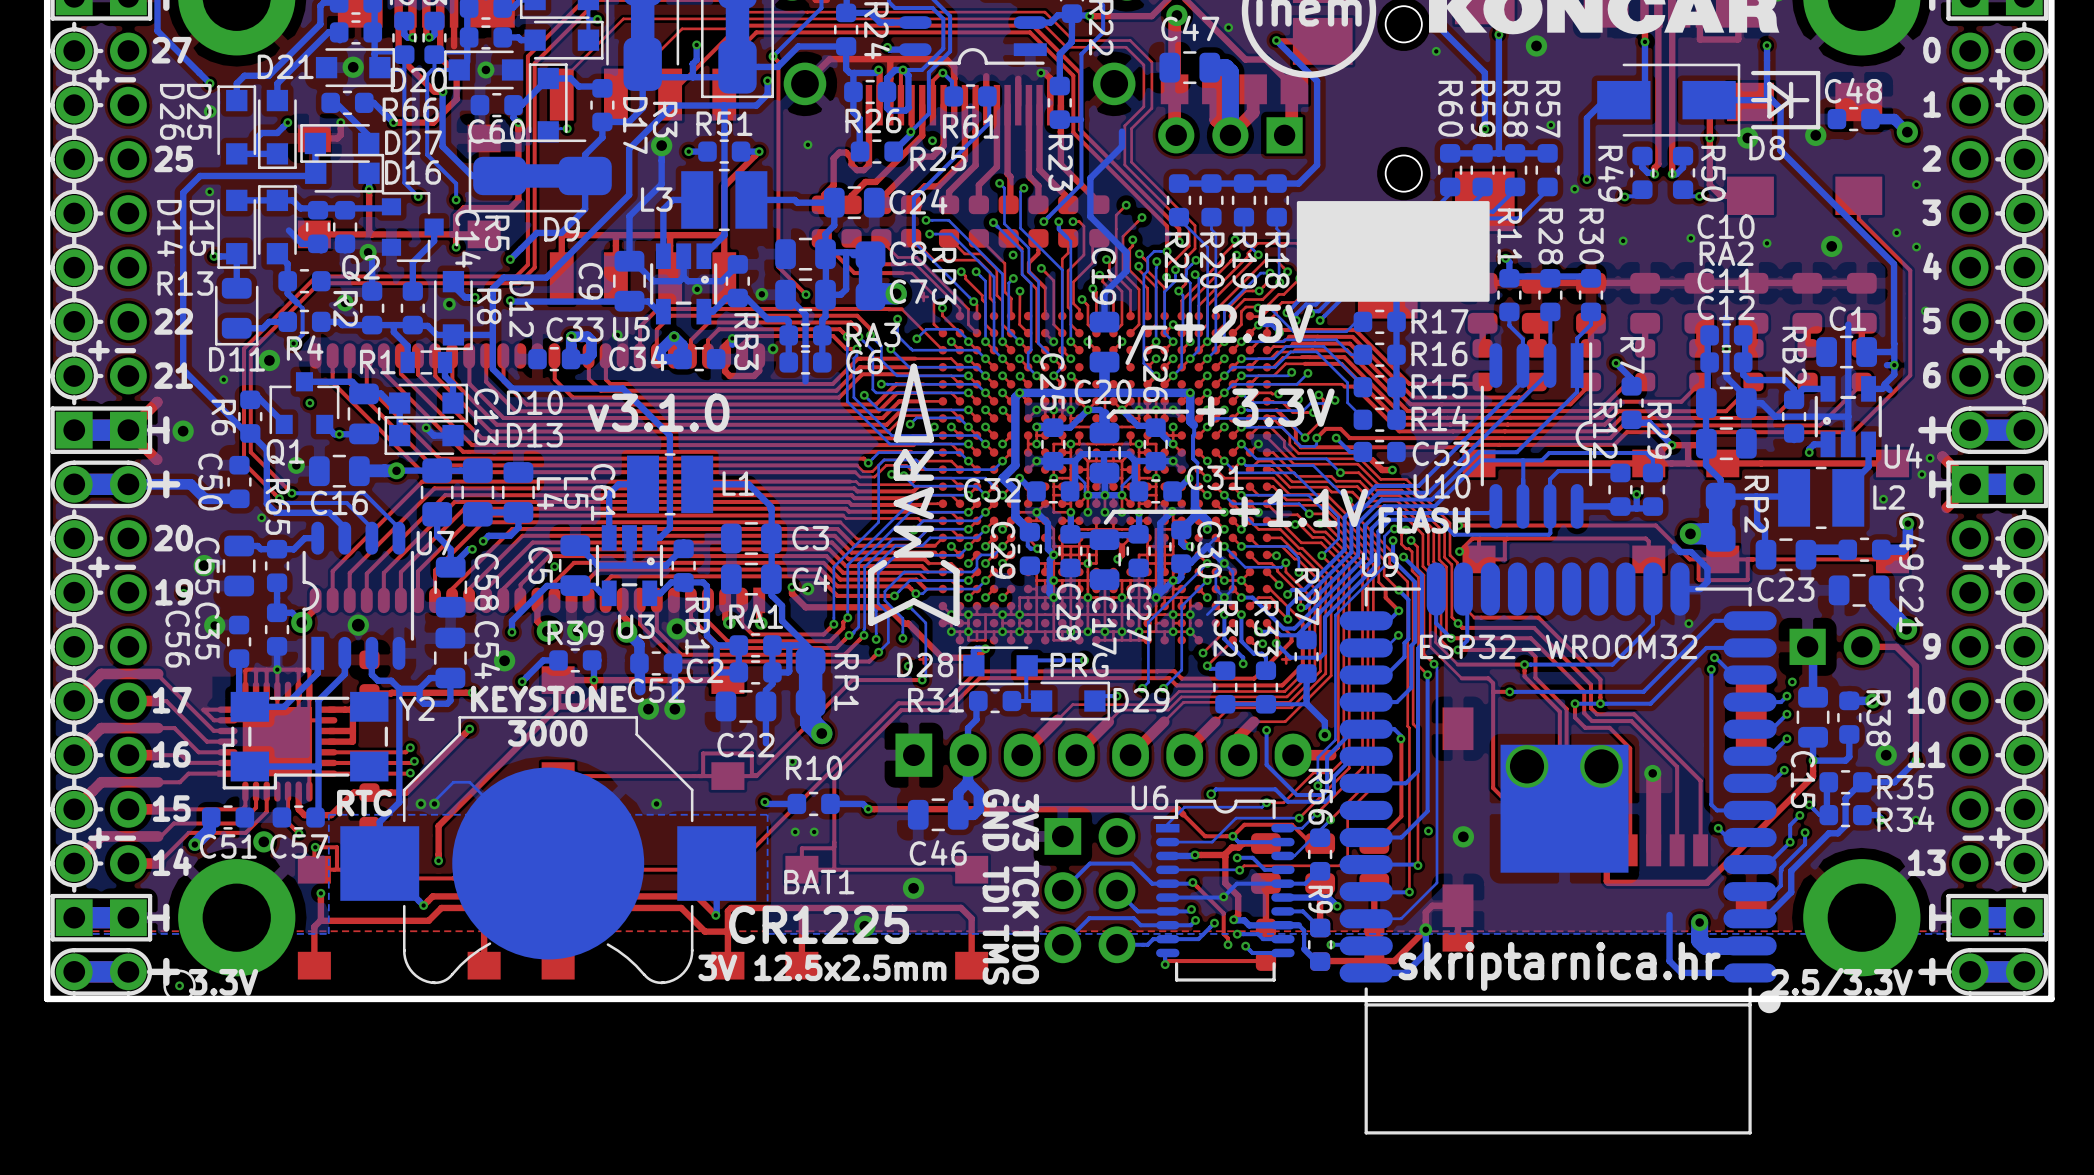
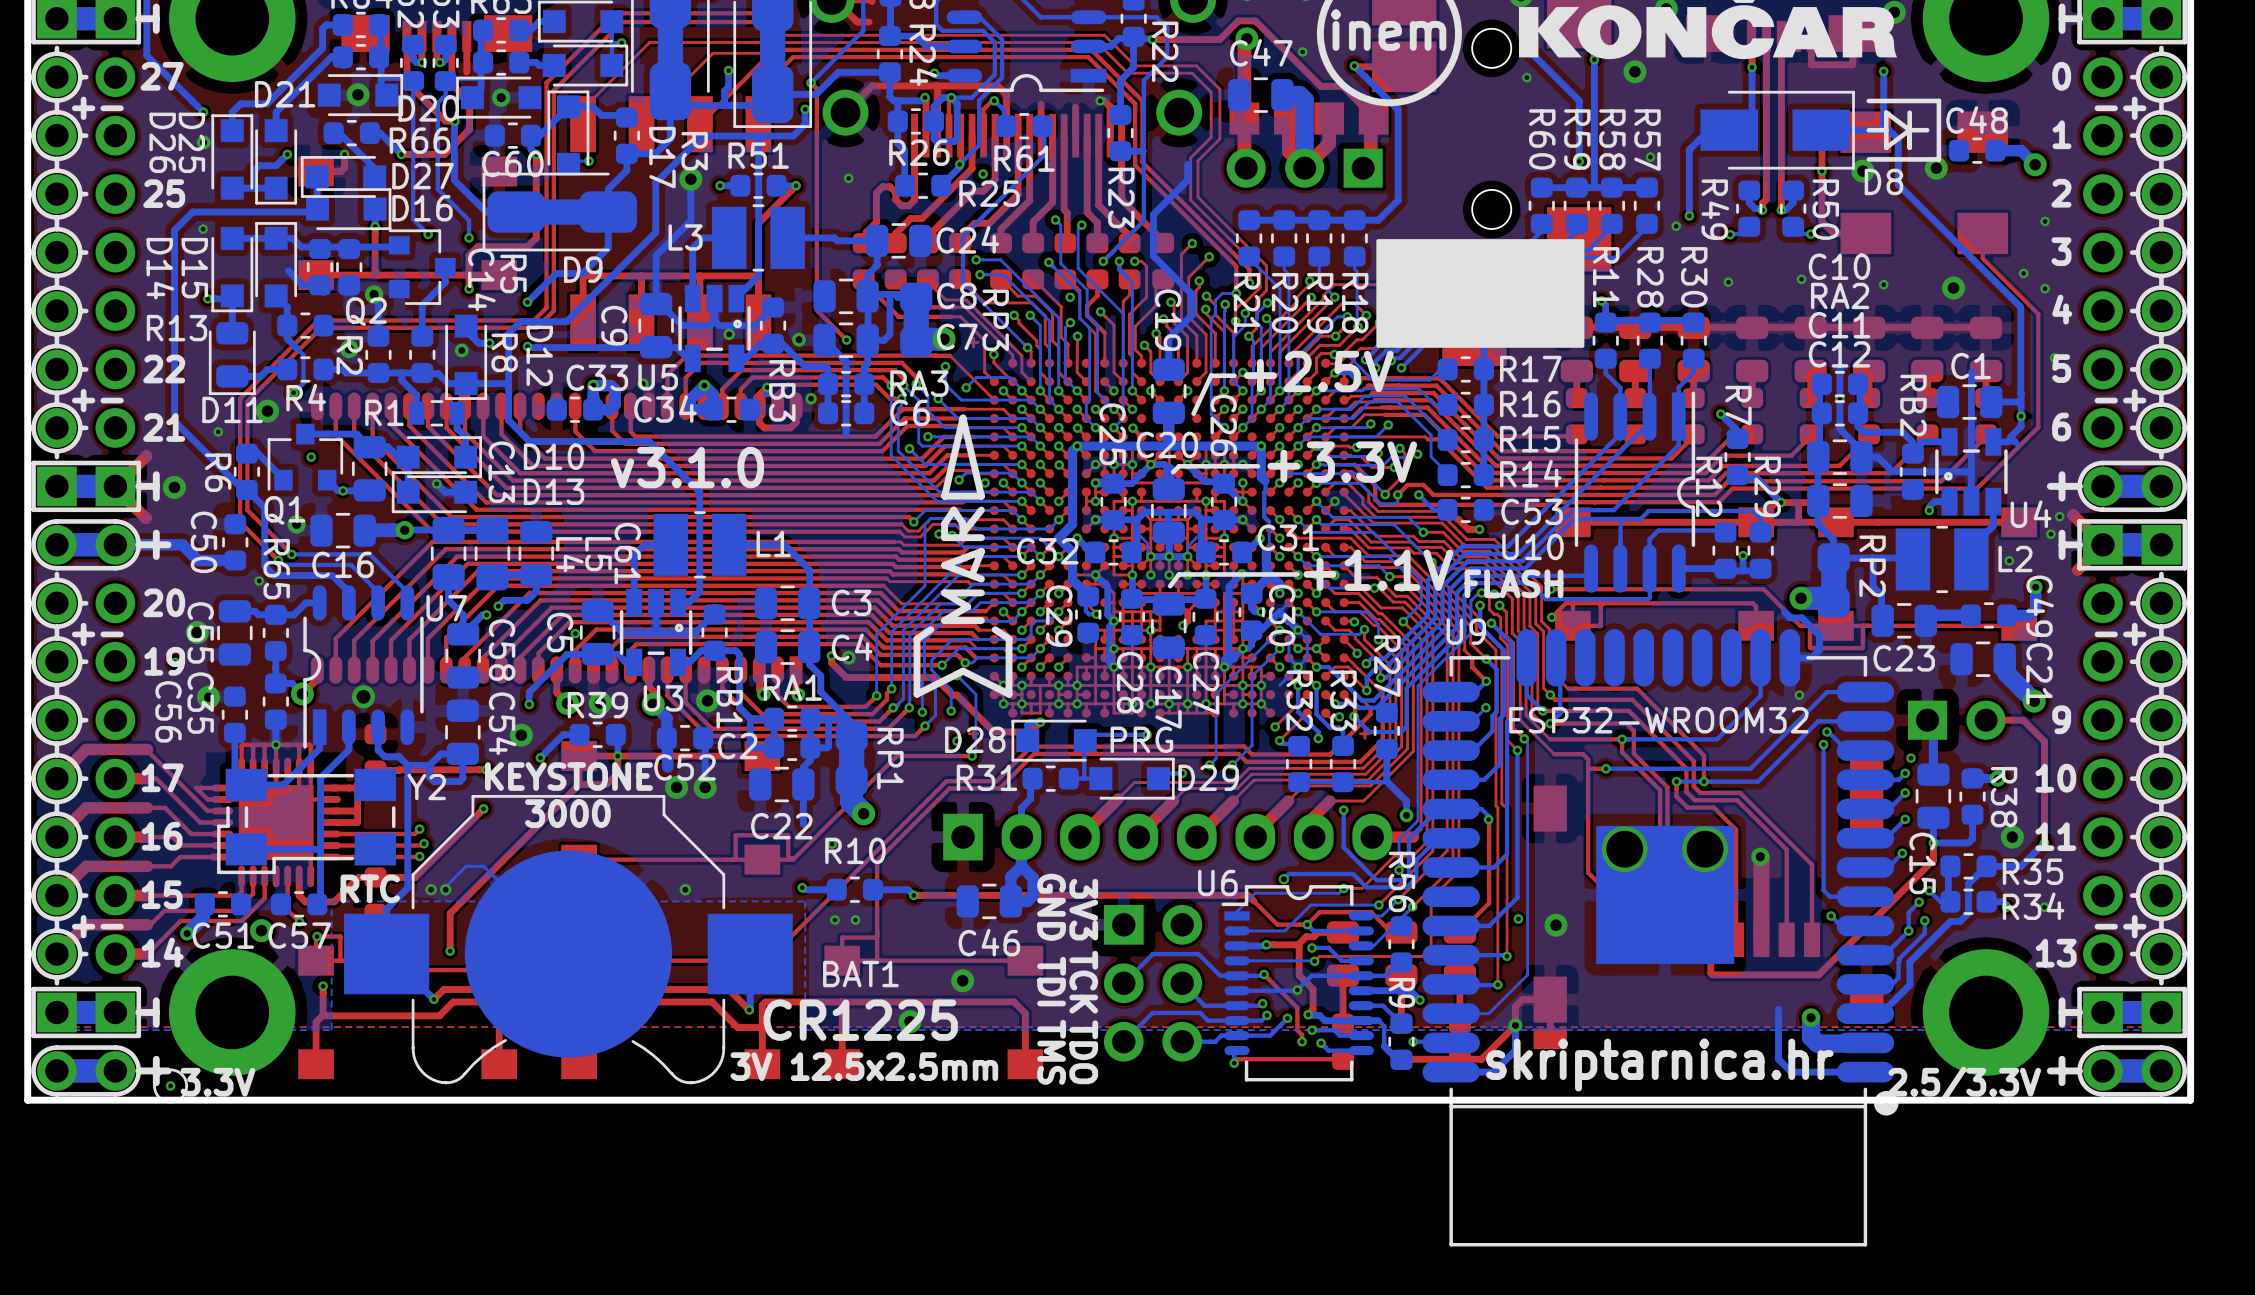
bottom track: (1894, 365) (1886, 365) -> none

